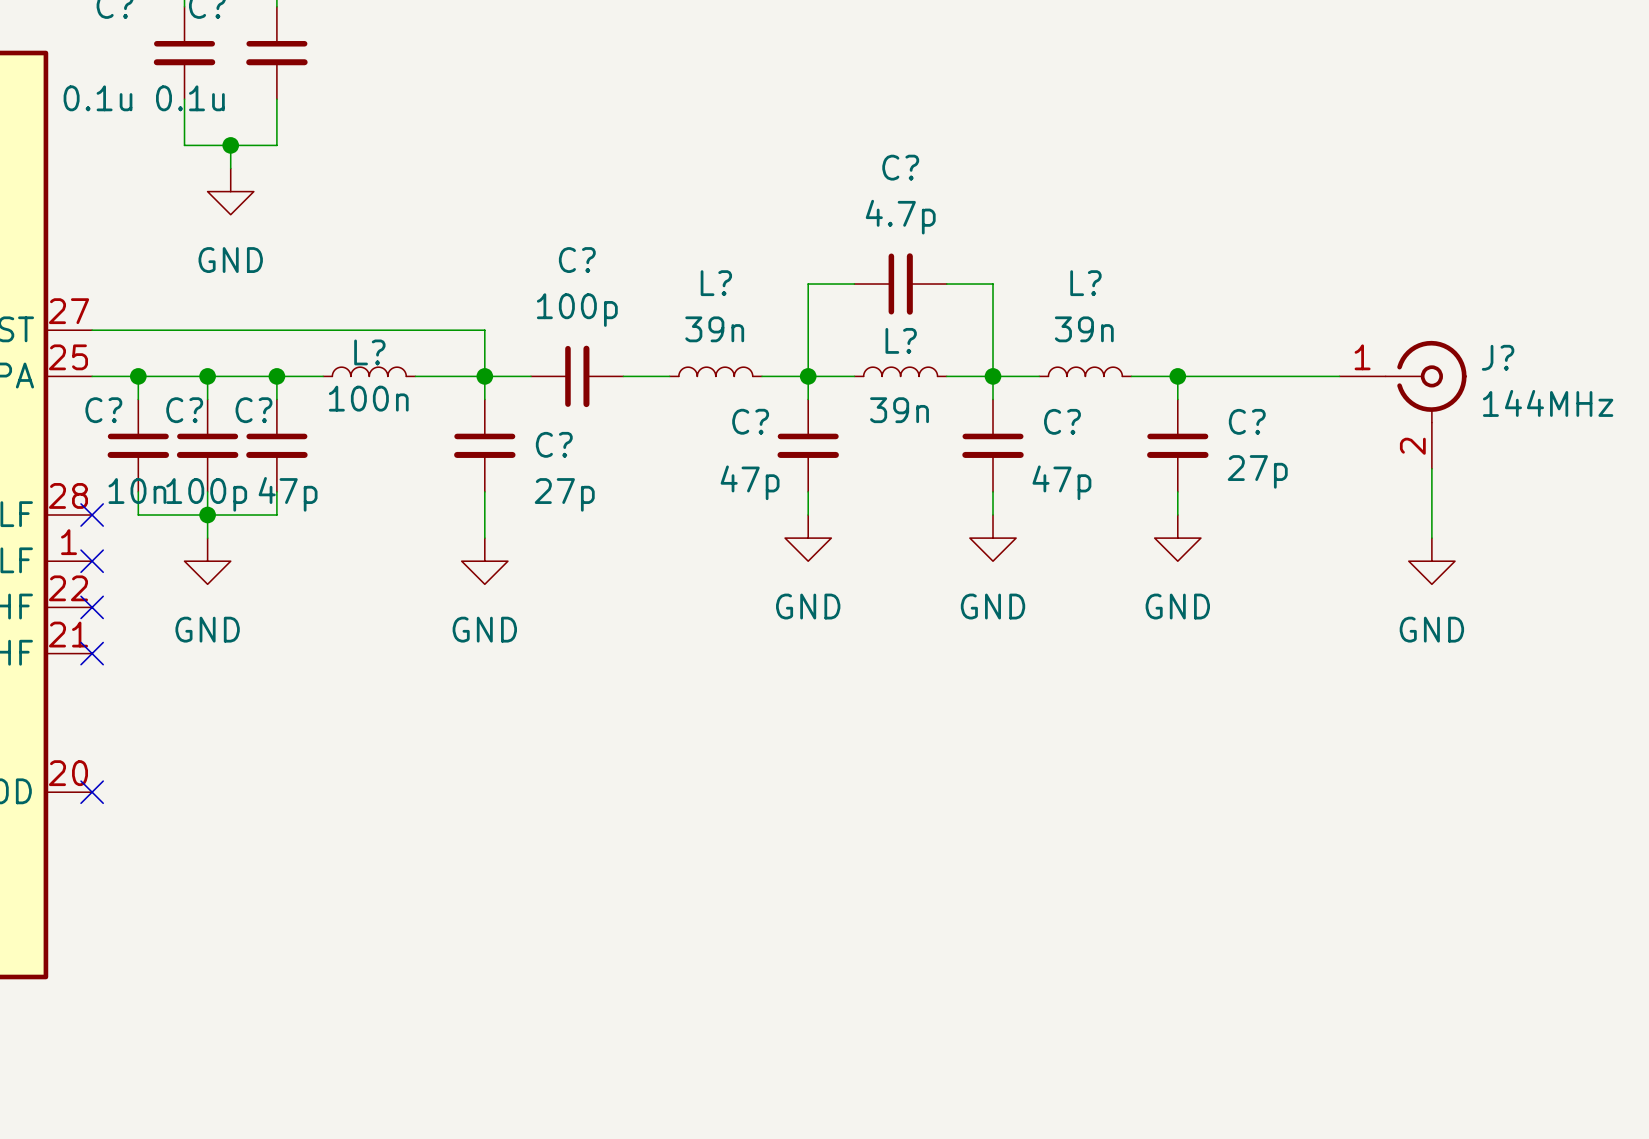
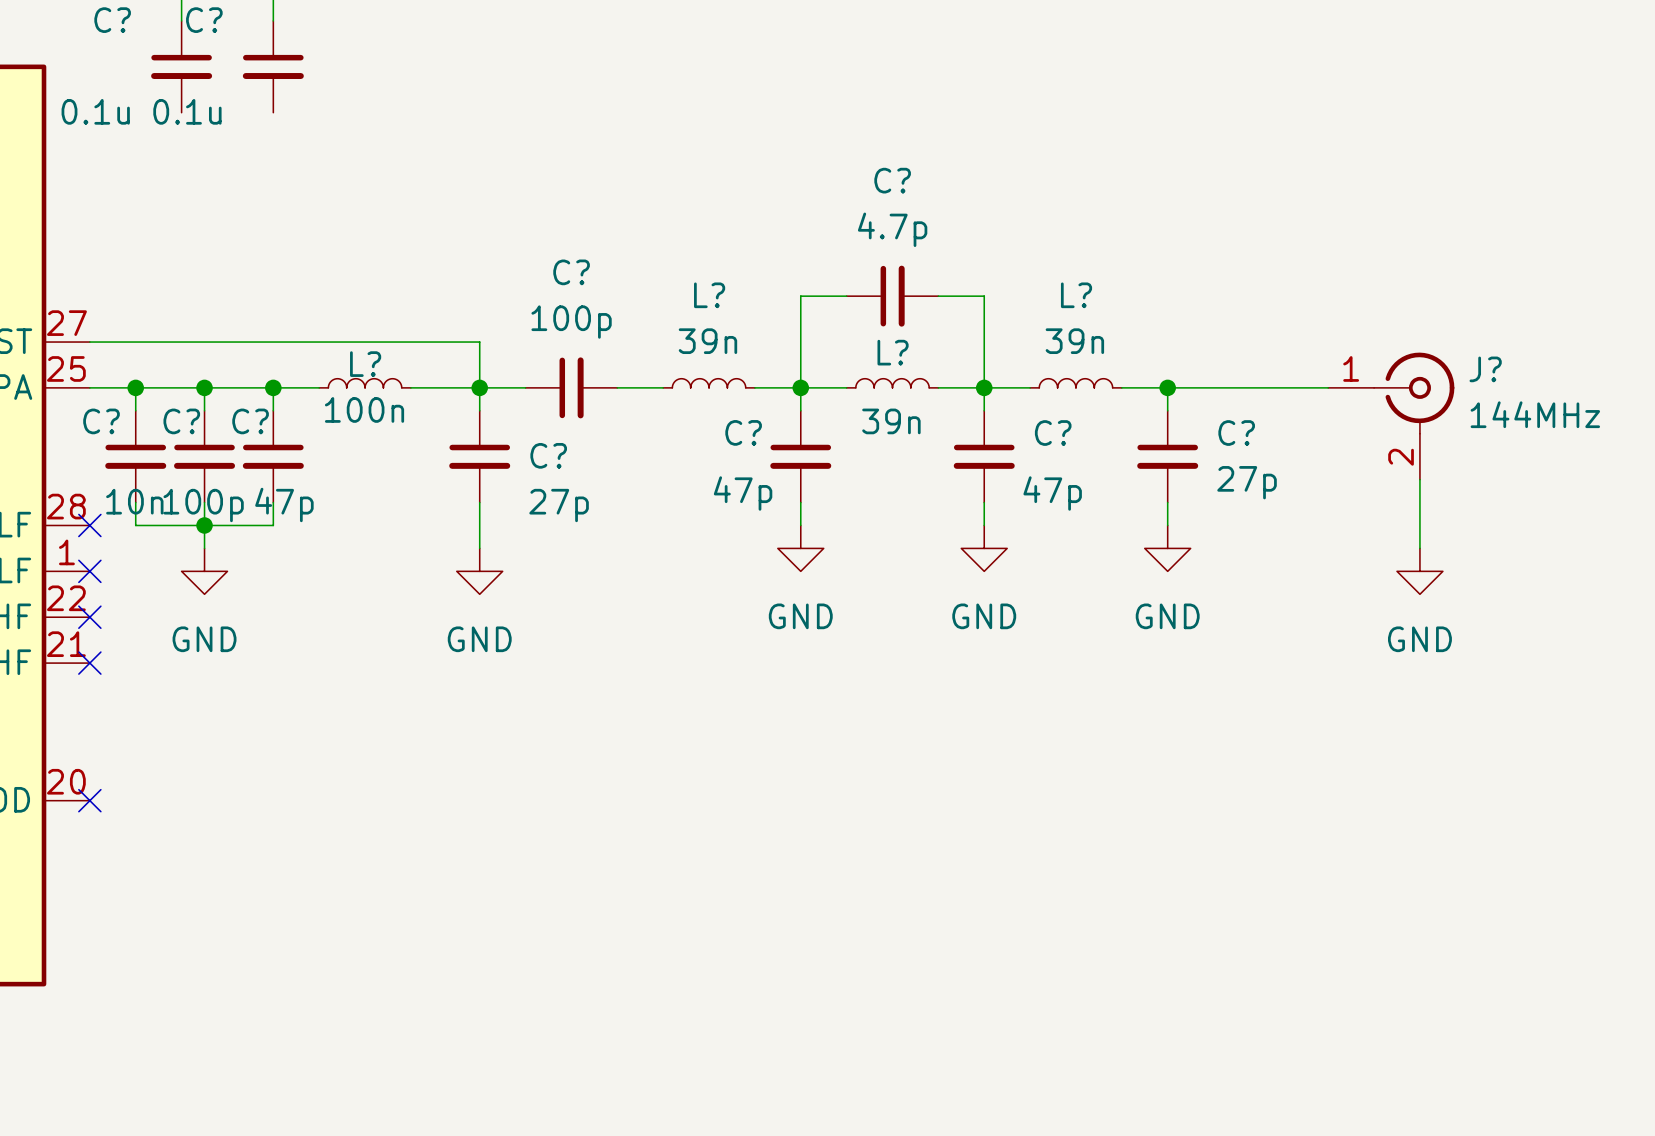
wire: (184, 99) (184, 145) (276, 145) (276, 99) -> none
wire: (230, 145) (230, 168) -> none
junction: (230, 145) -> none
power symbol: GND (230, 191) -> none

